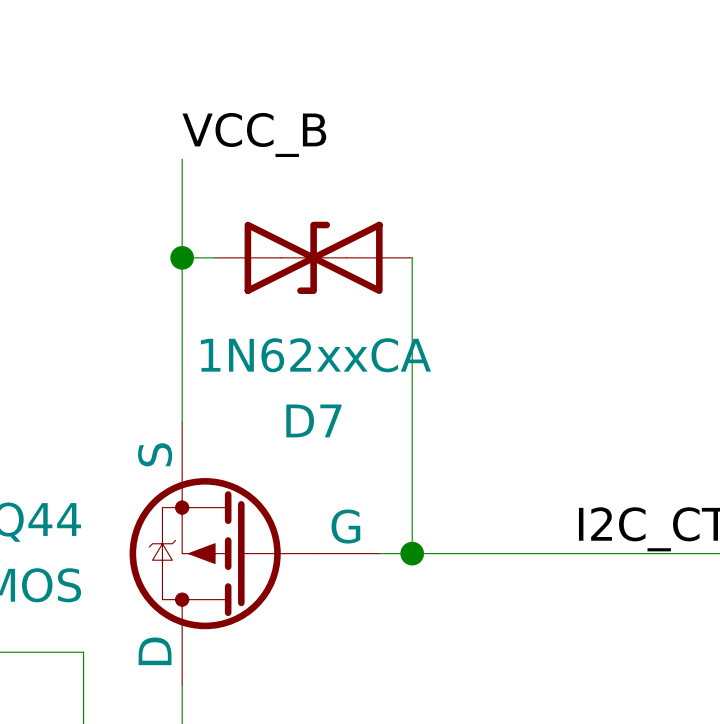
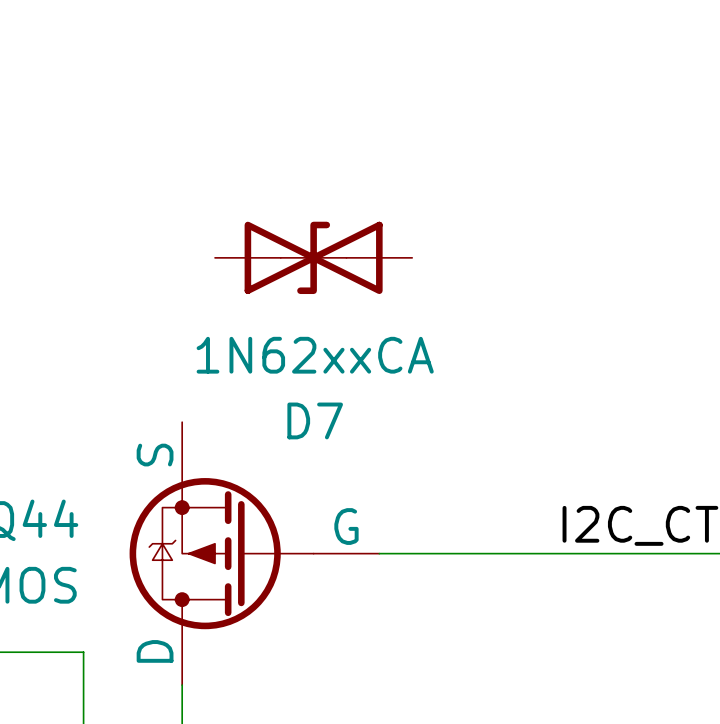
label: VCC_B (254, 134) -> none
wire: (182, 159) (182, 422) -> none
wire: (182, 257) (215, 257) -> none
junction: (182, 257) -> none
wire: (412, 257) (412, 553) -> none
junction: (412, 553) -> none

